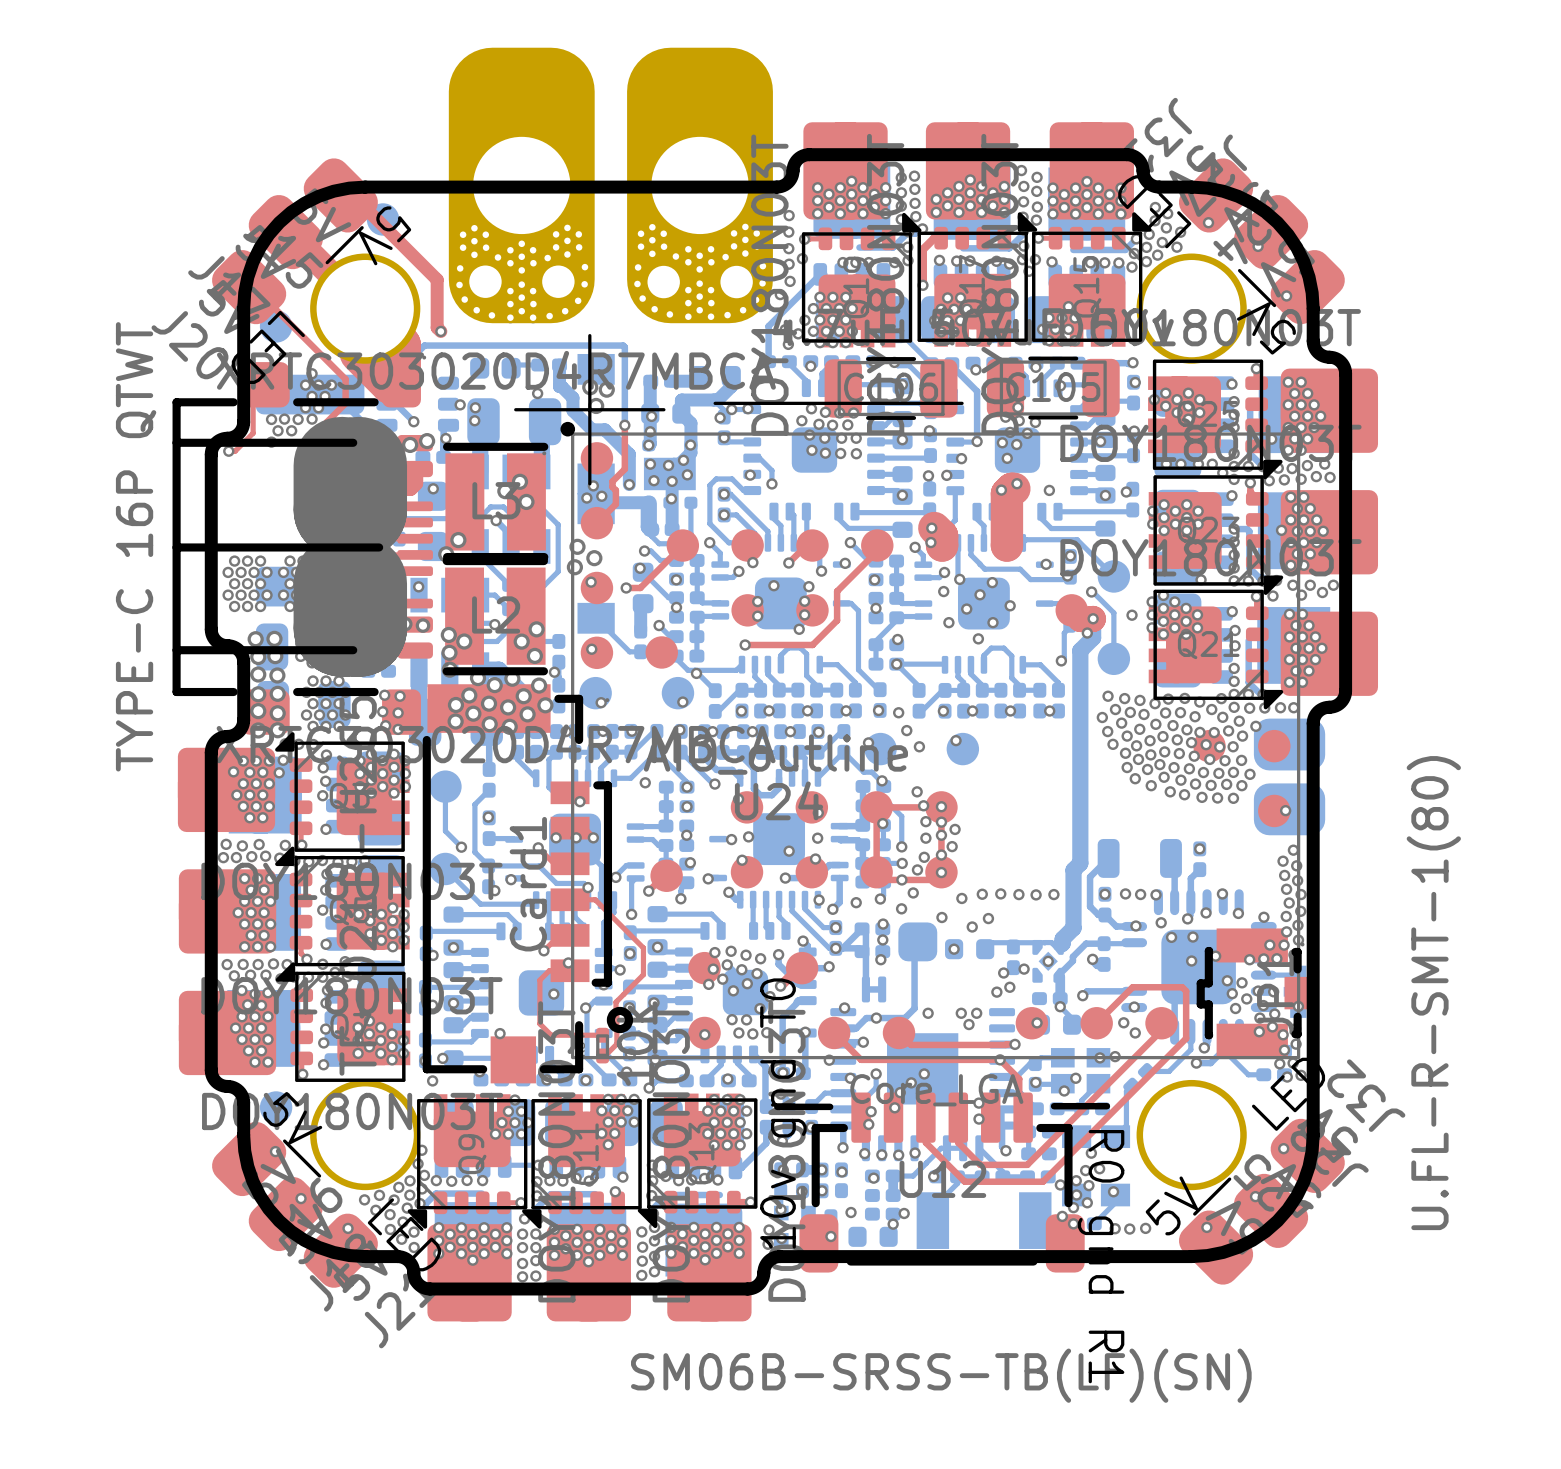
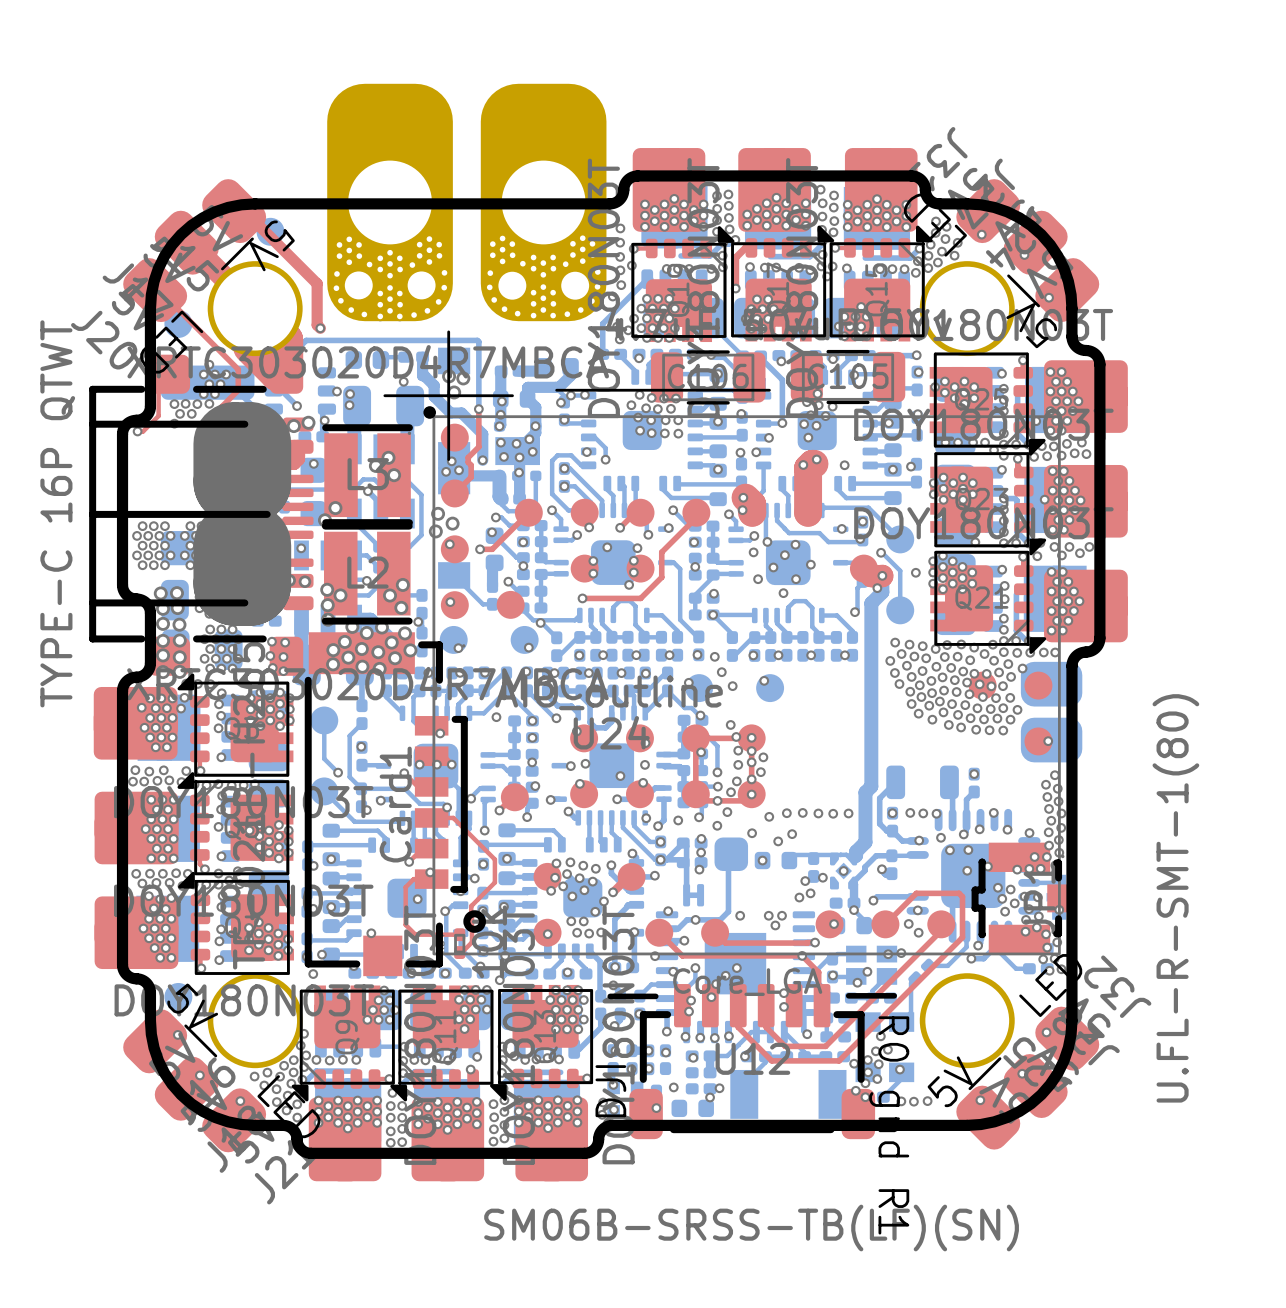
text: 10v gnd T0 (783, 1113) -> DJI (610, 1091)

